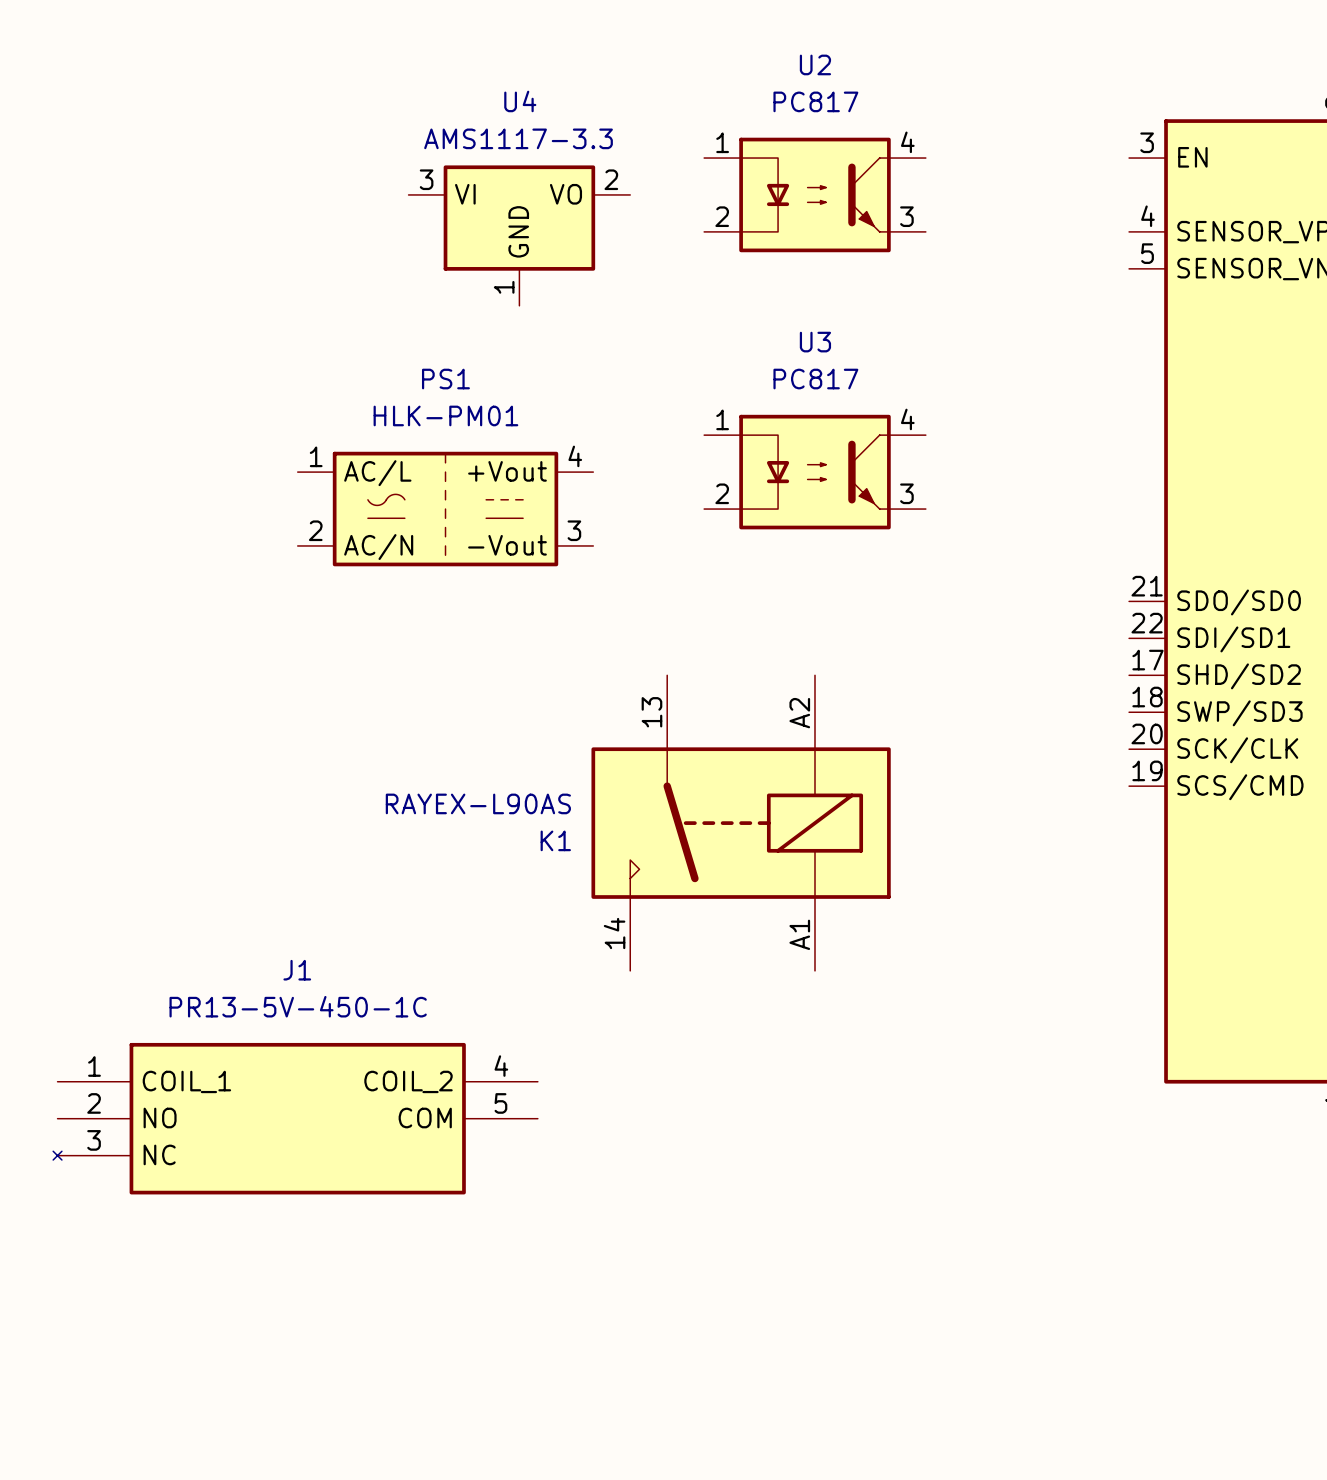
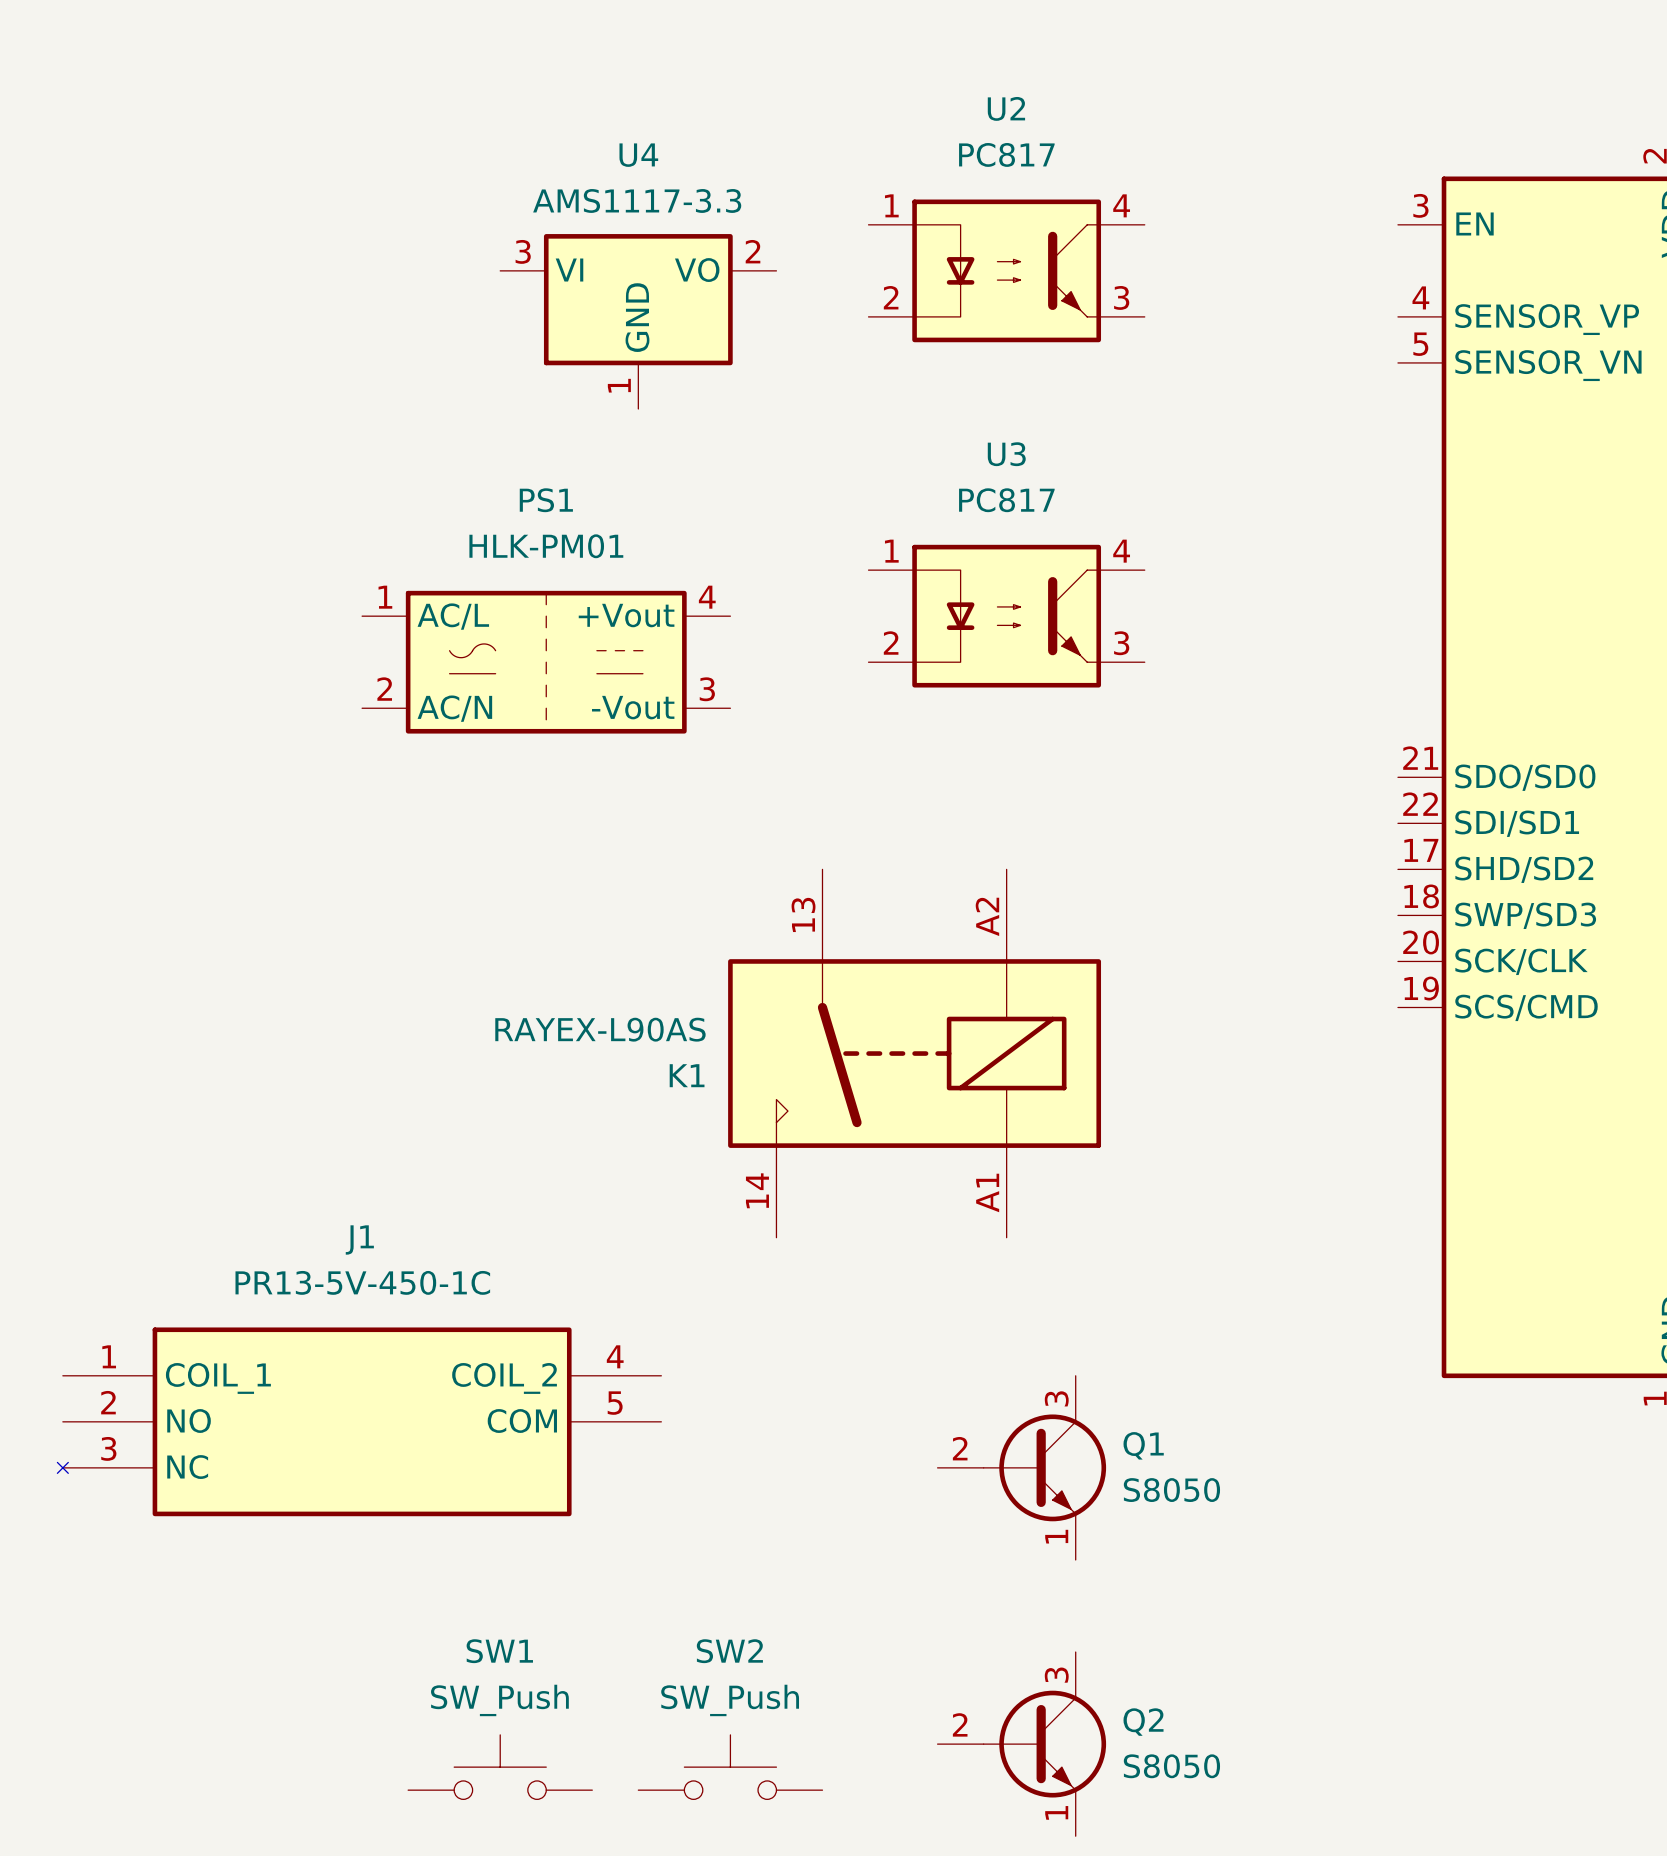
Q1: none -> S8050 (1021, 1467)
Q2: none -> S8050 (1021, 1744)
SW1: none -> SW_Push (500, 1767)
SW2: none -> SW_Push (730, 1767)

